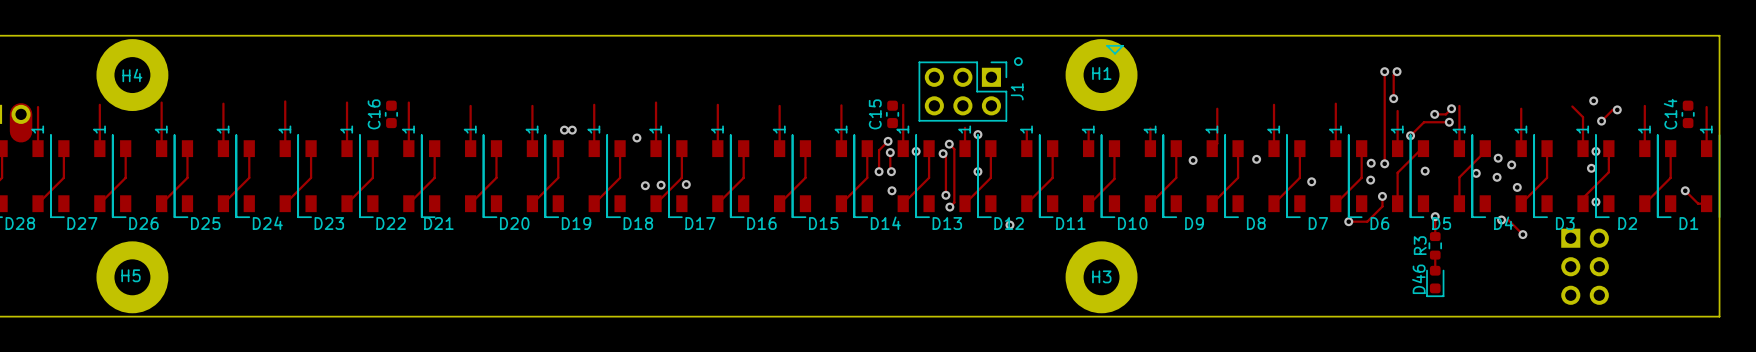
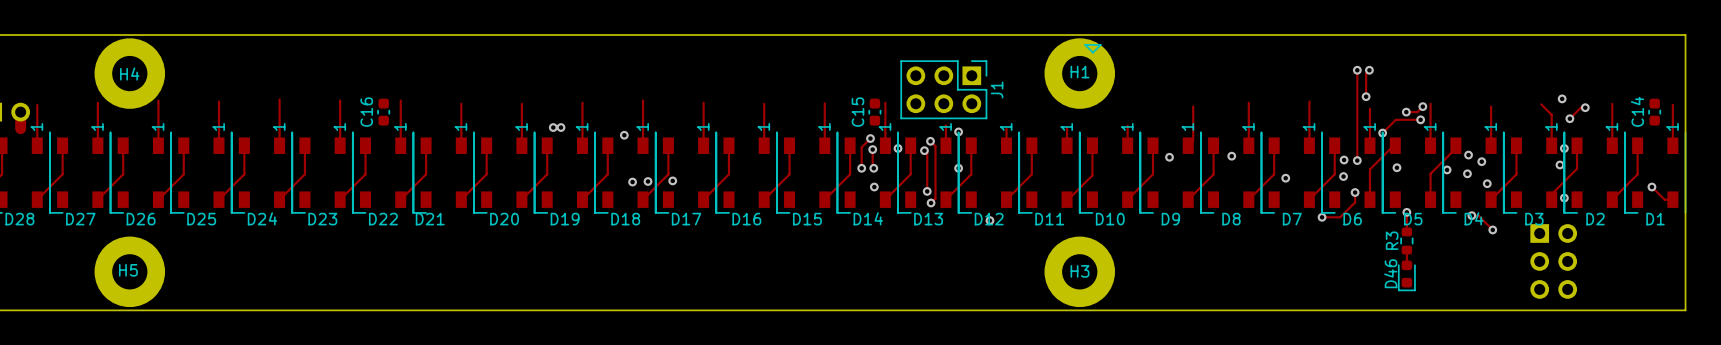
drawing: [1014, 57, 1023, 66] -> none
track width: thick (21, 114) (21, 131) -> thin (20, 112) (20, 128)

